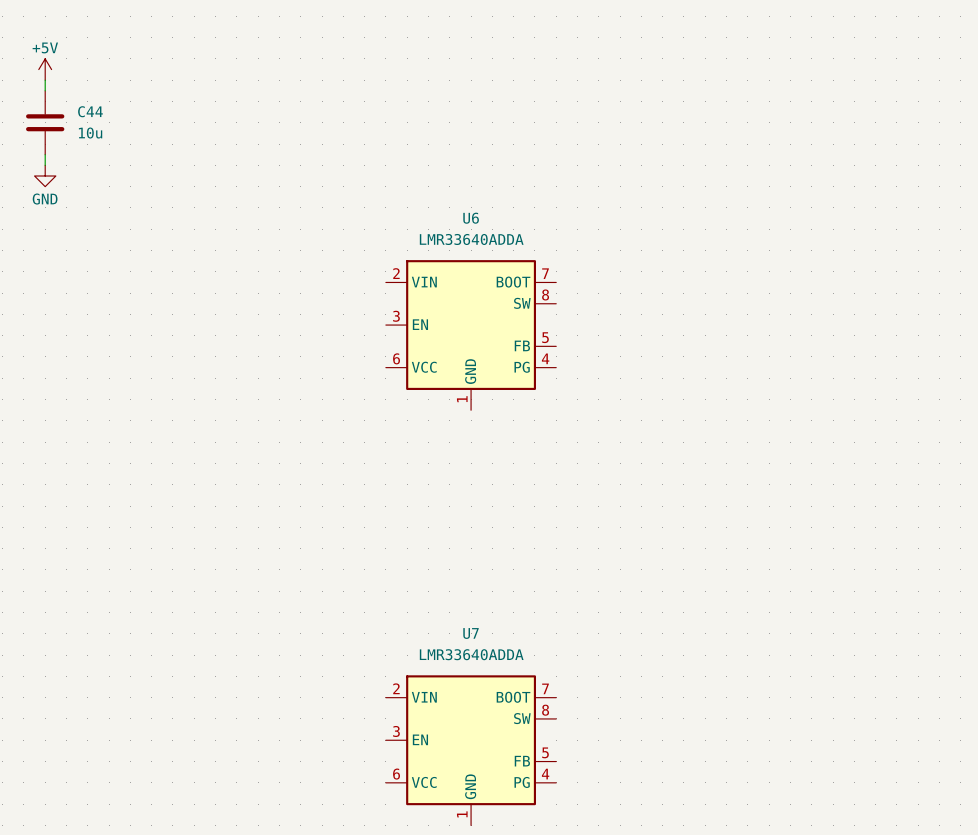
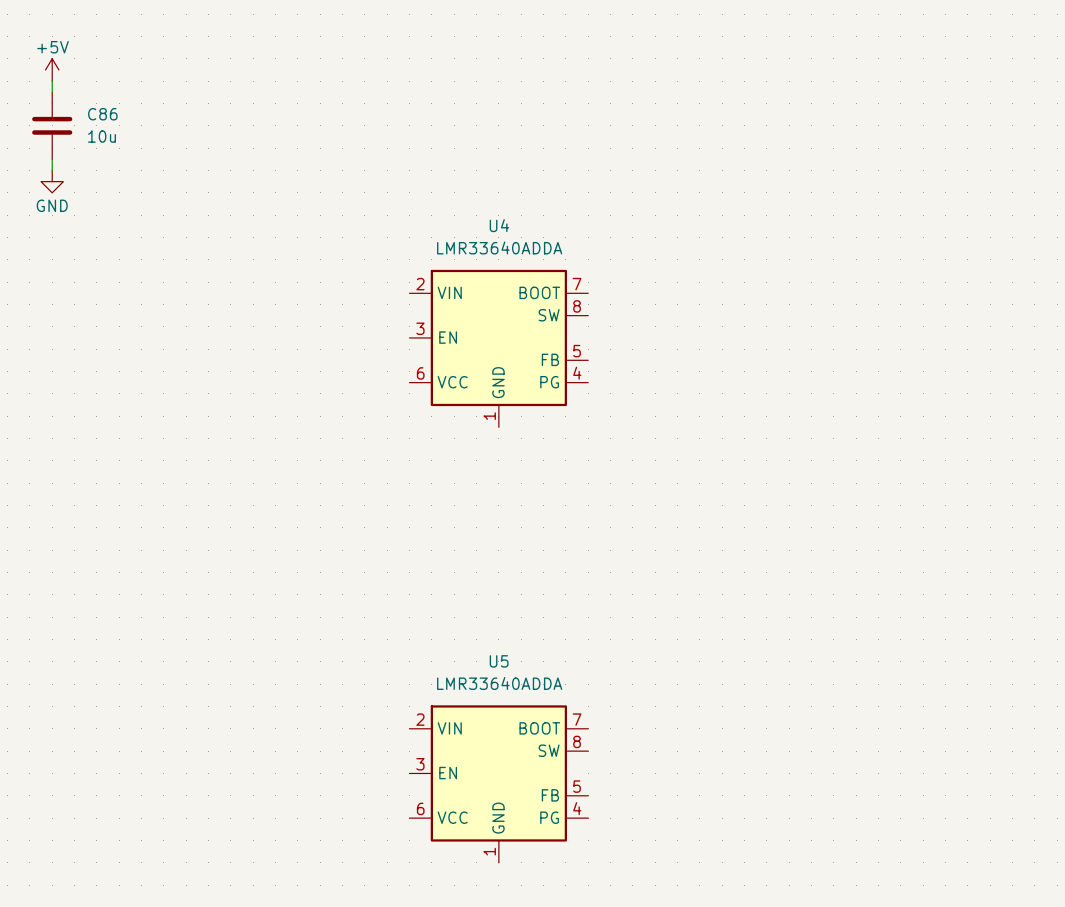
C44 name: C44 (90, 111) -> C86 (102, 114)
U6 name: U6 (471, 218) -> U4 (499, 225)
U7 name: U7 (471, 633) -> U5 (499, 661)

